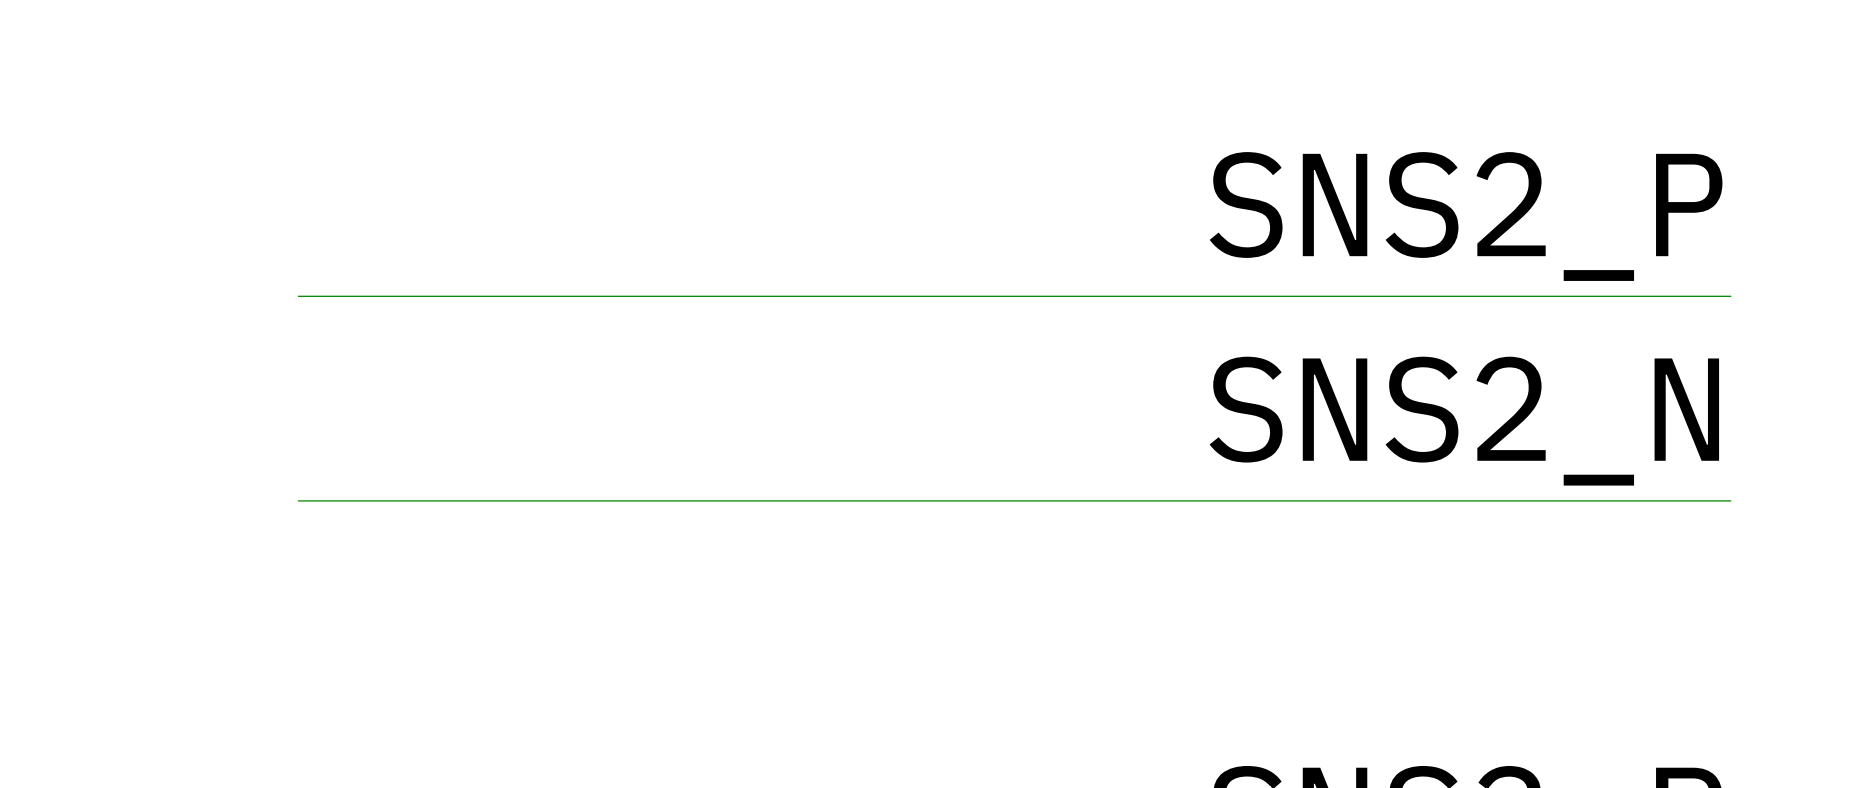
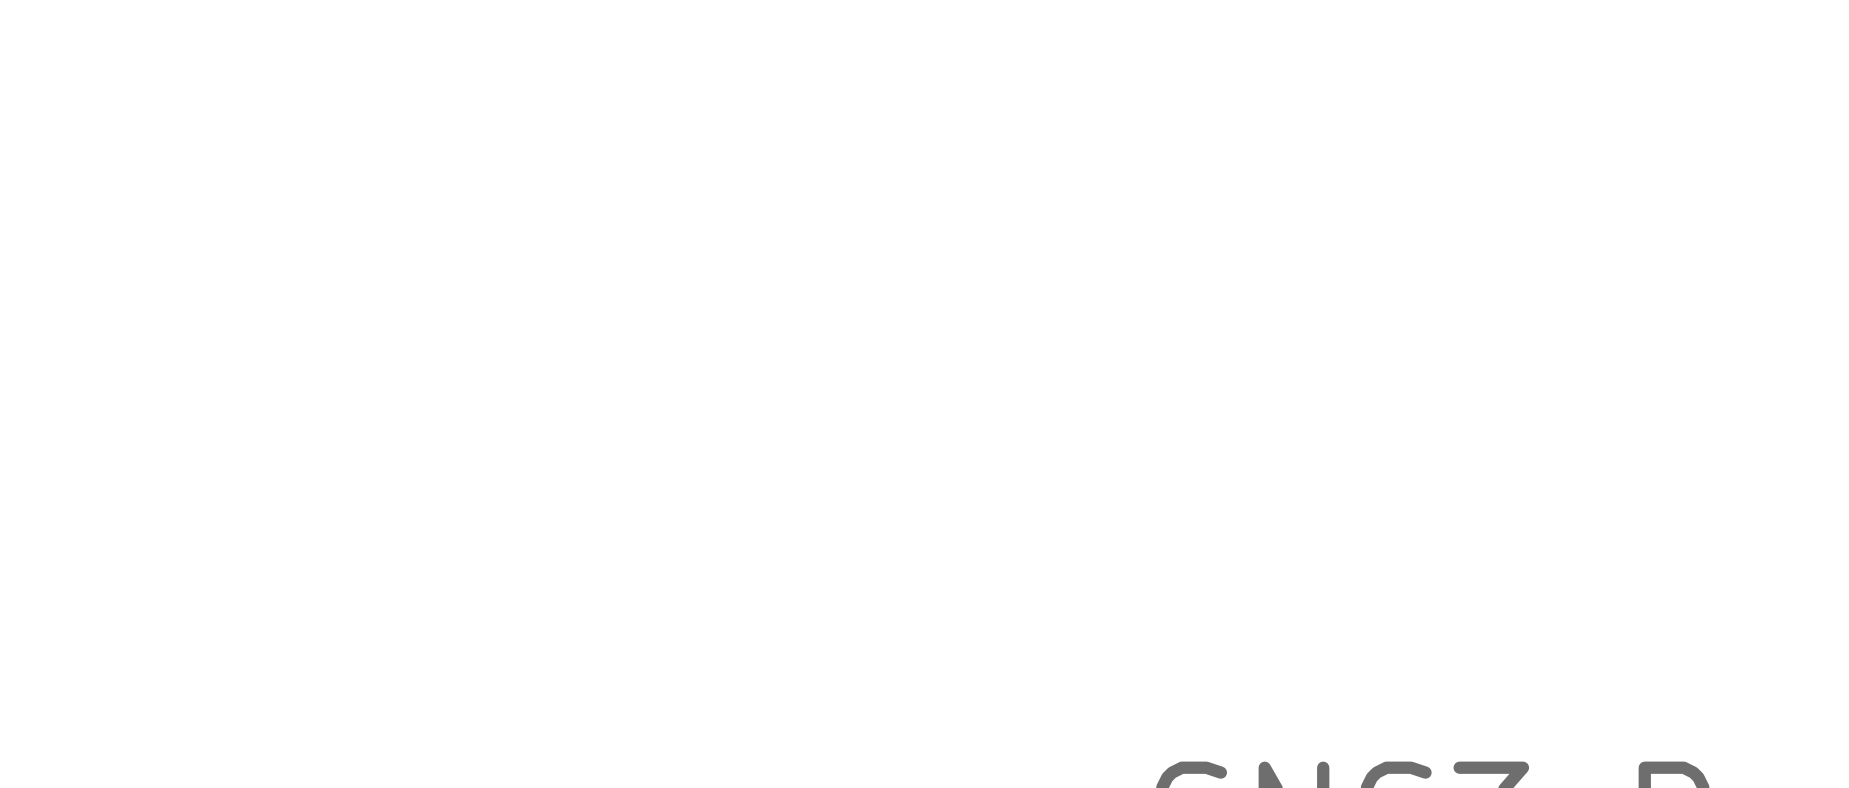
label: SNS2_P (1466, 216) -> none
wire: (298, 296) (1730, 296) -> none
label: SNS2_N (1464, 421) -> none
wire: (298, 500) (1730, 500) -> none

